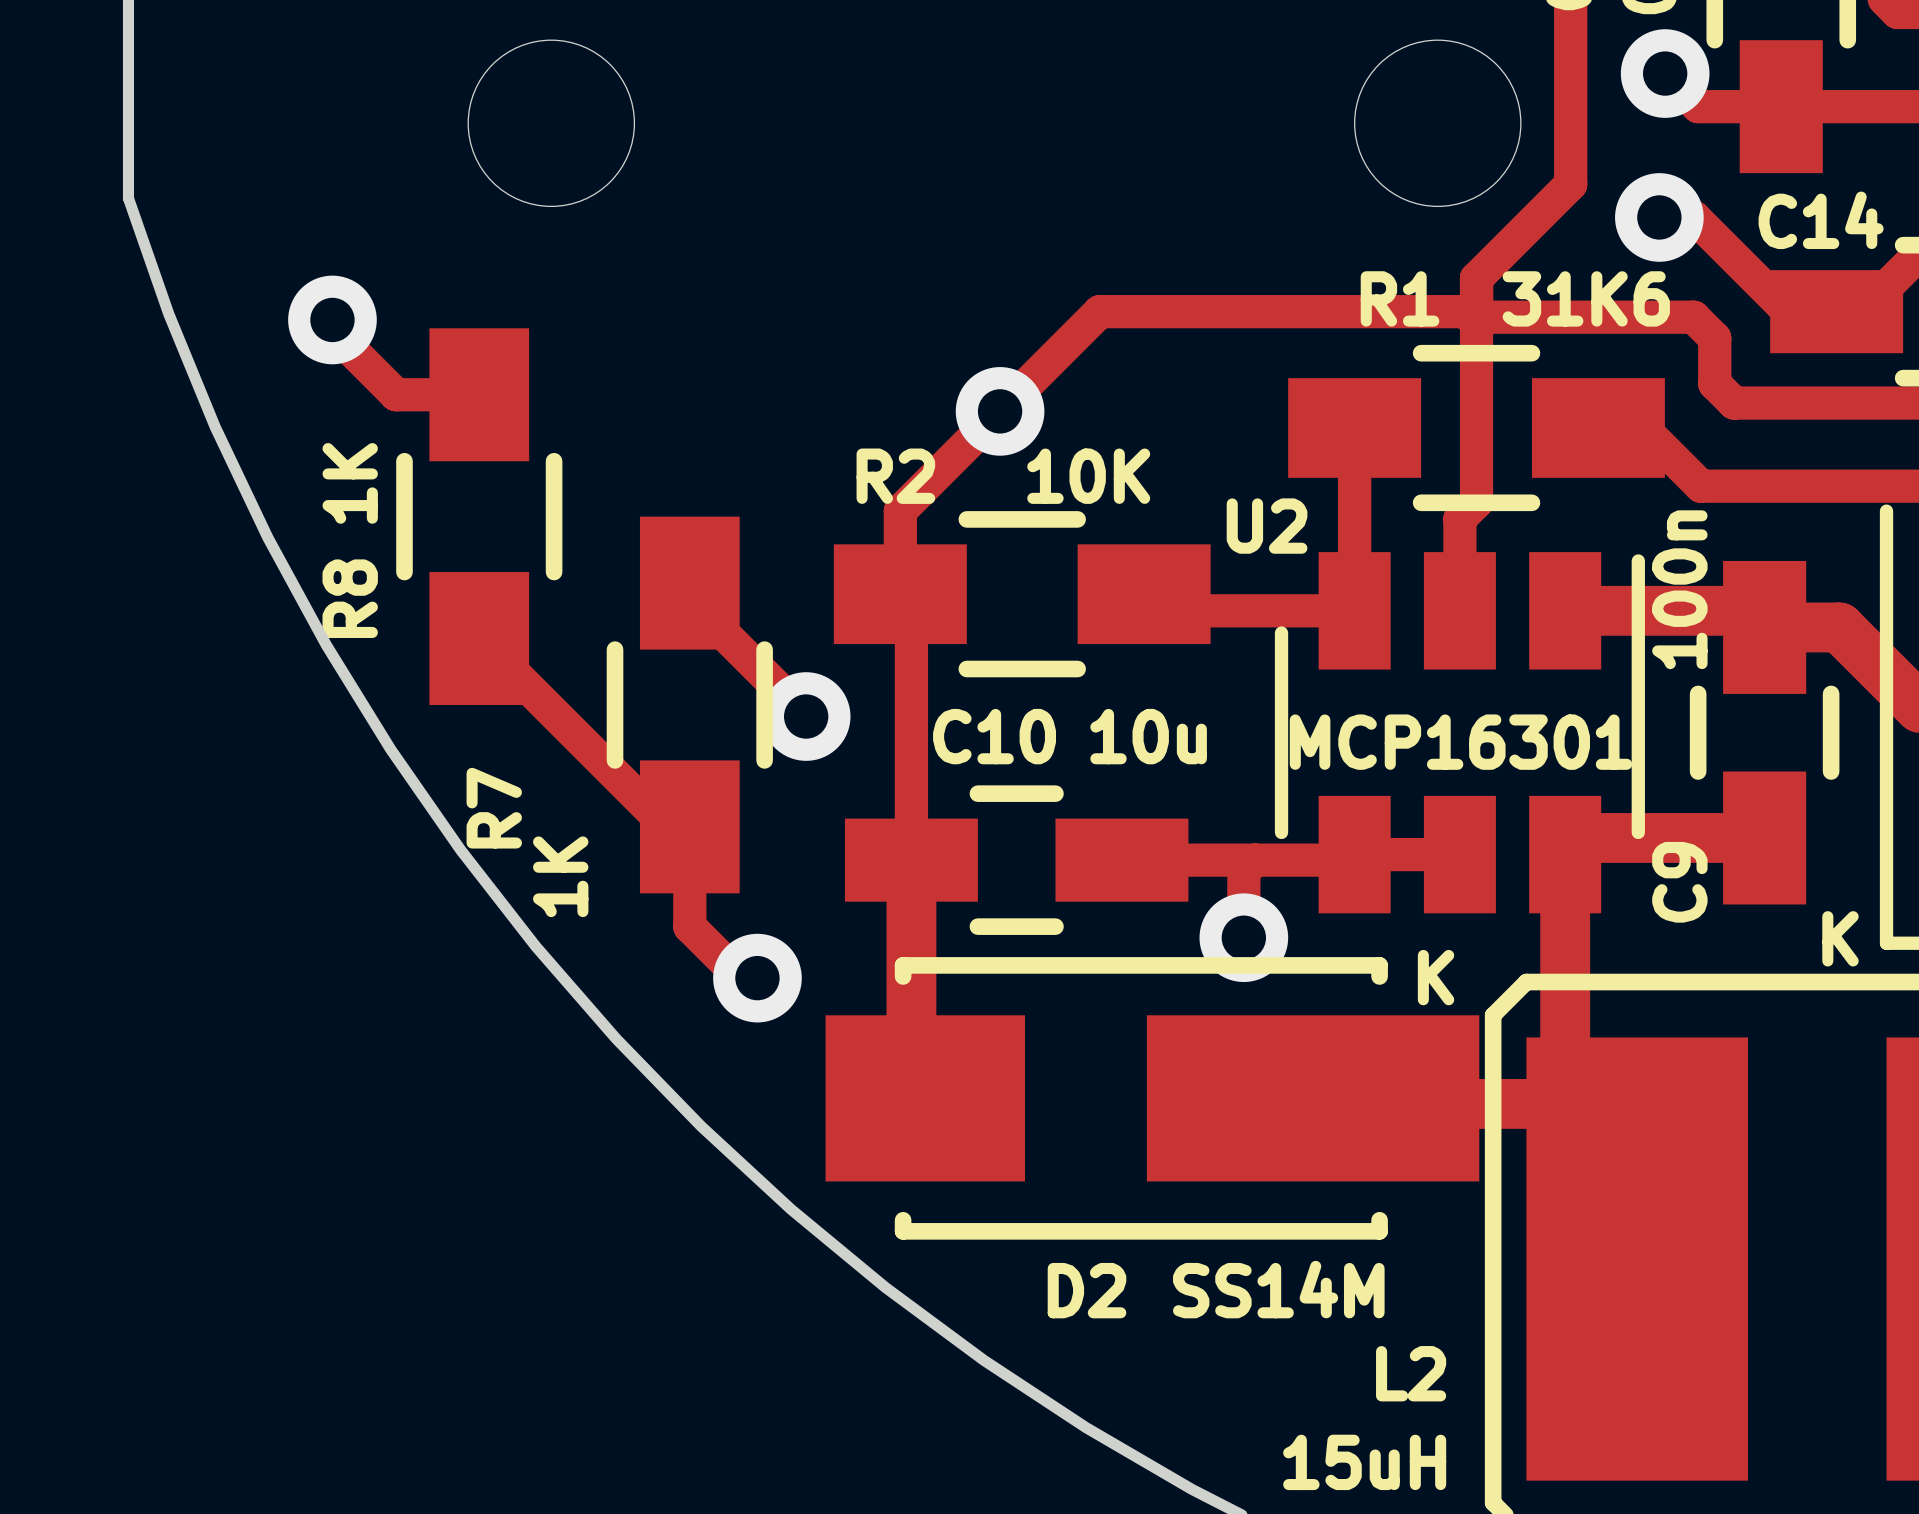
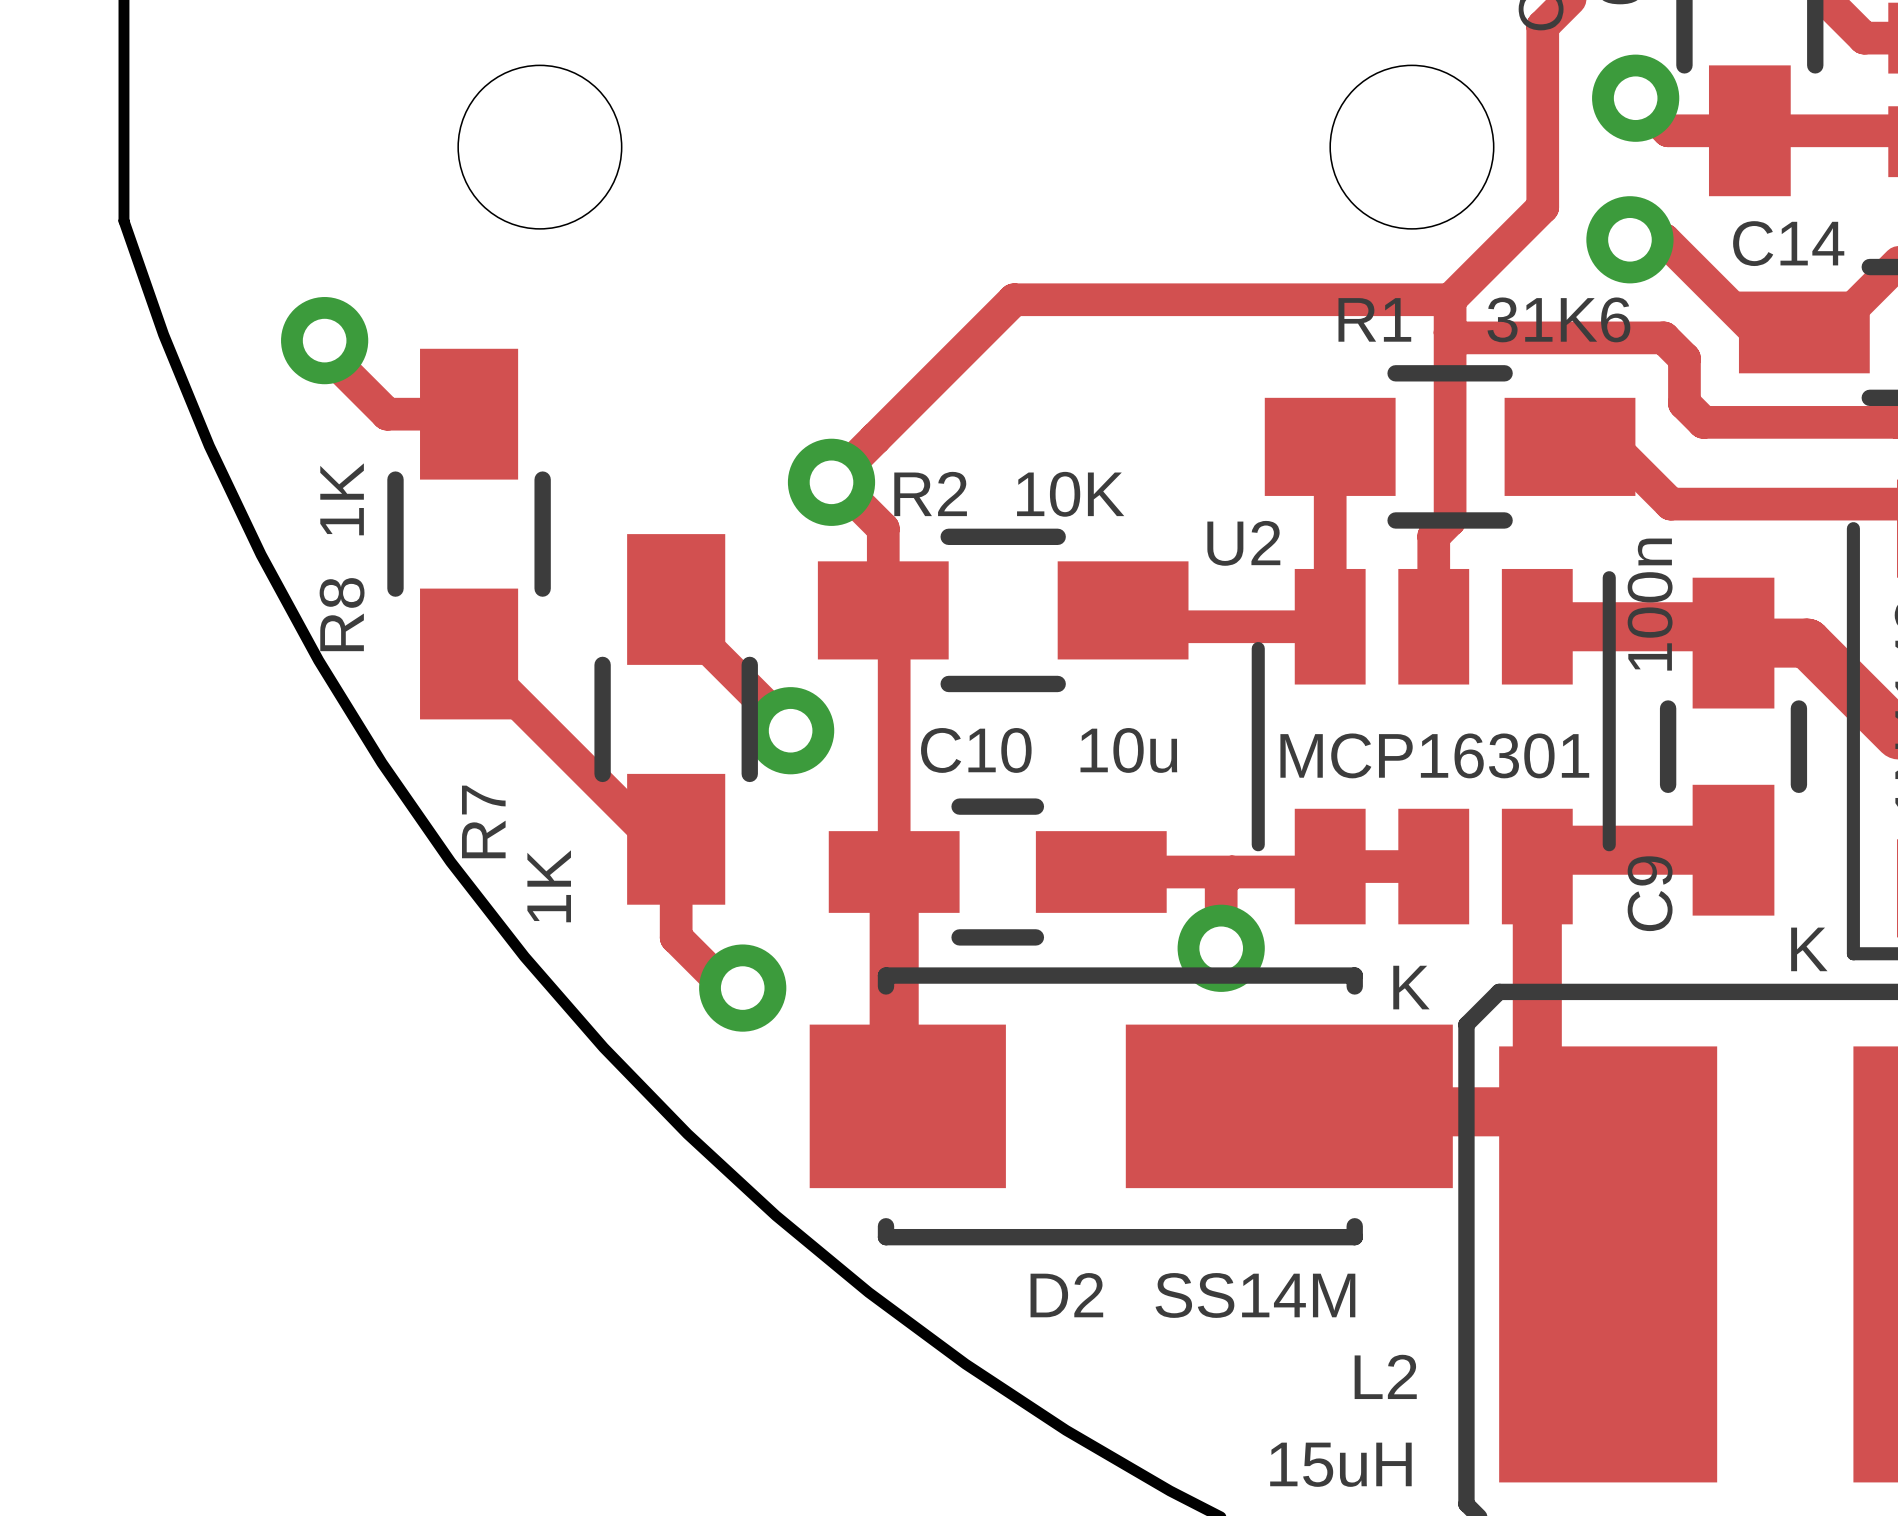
track: (1476, 322) (1465, 311) (1099, 311) (900, 511) -> (1450, 299) (1014, 299) (831, 482) (836, 482) (883, 528)
via position: (1000, 411) -> (831, 482)
R2 name position: R2 (895, 476) -> R2 (930, 493)

